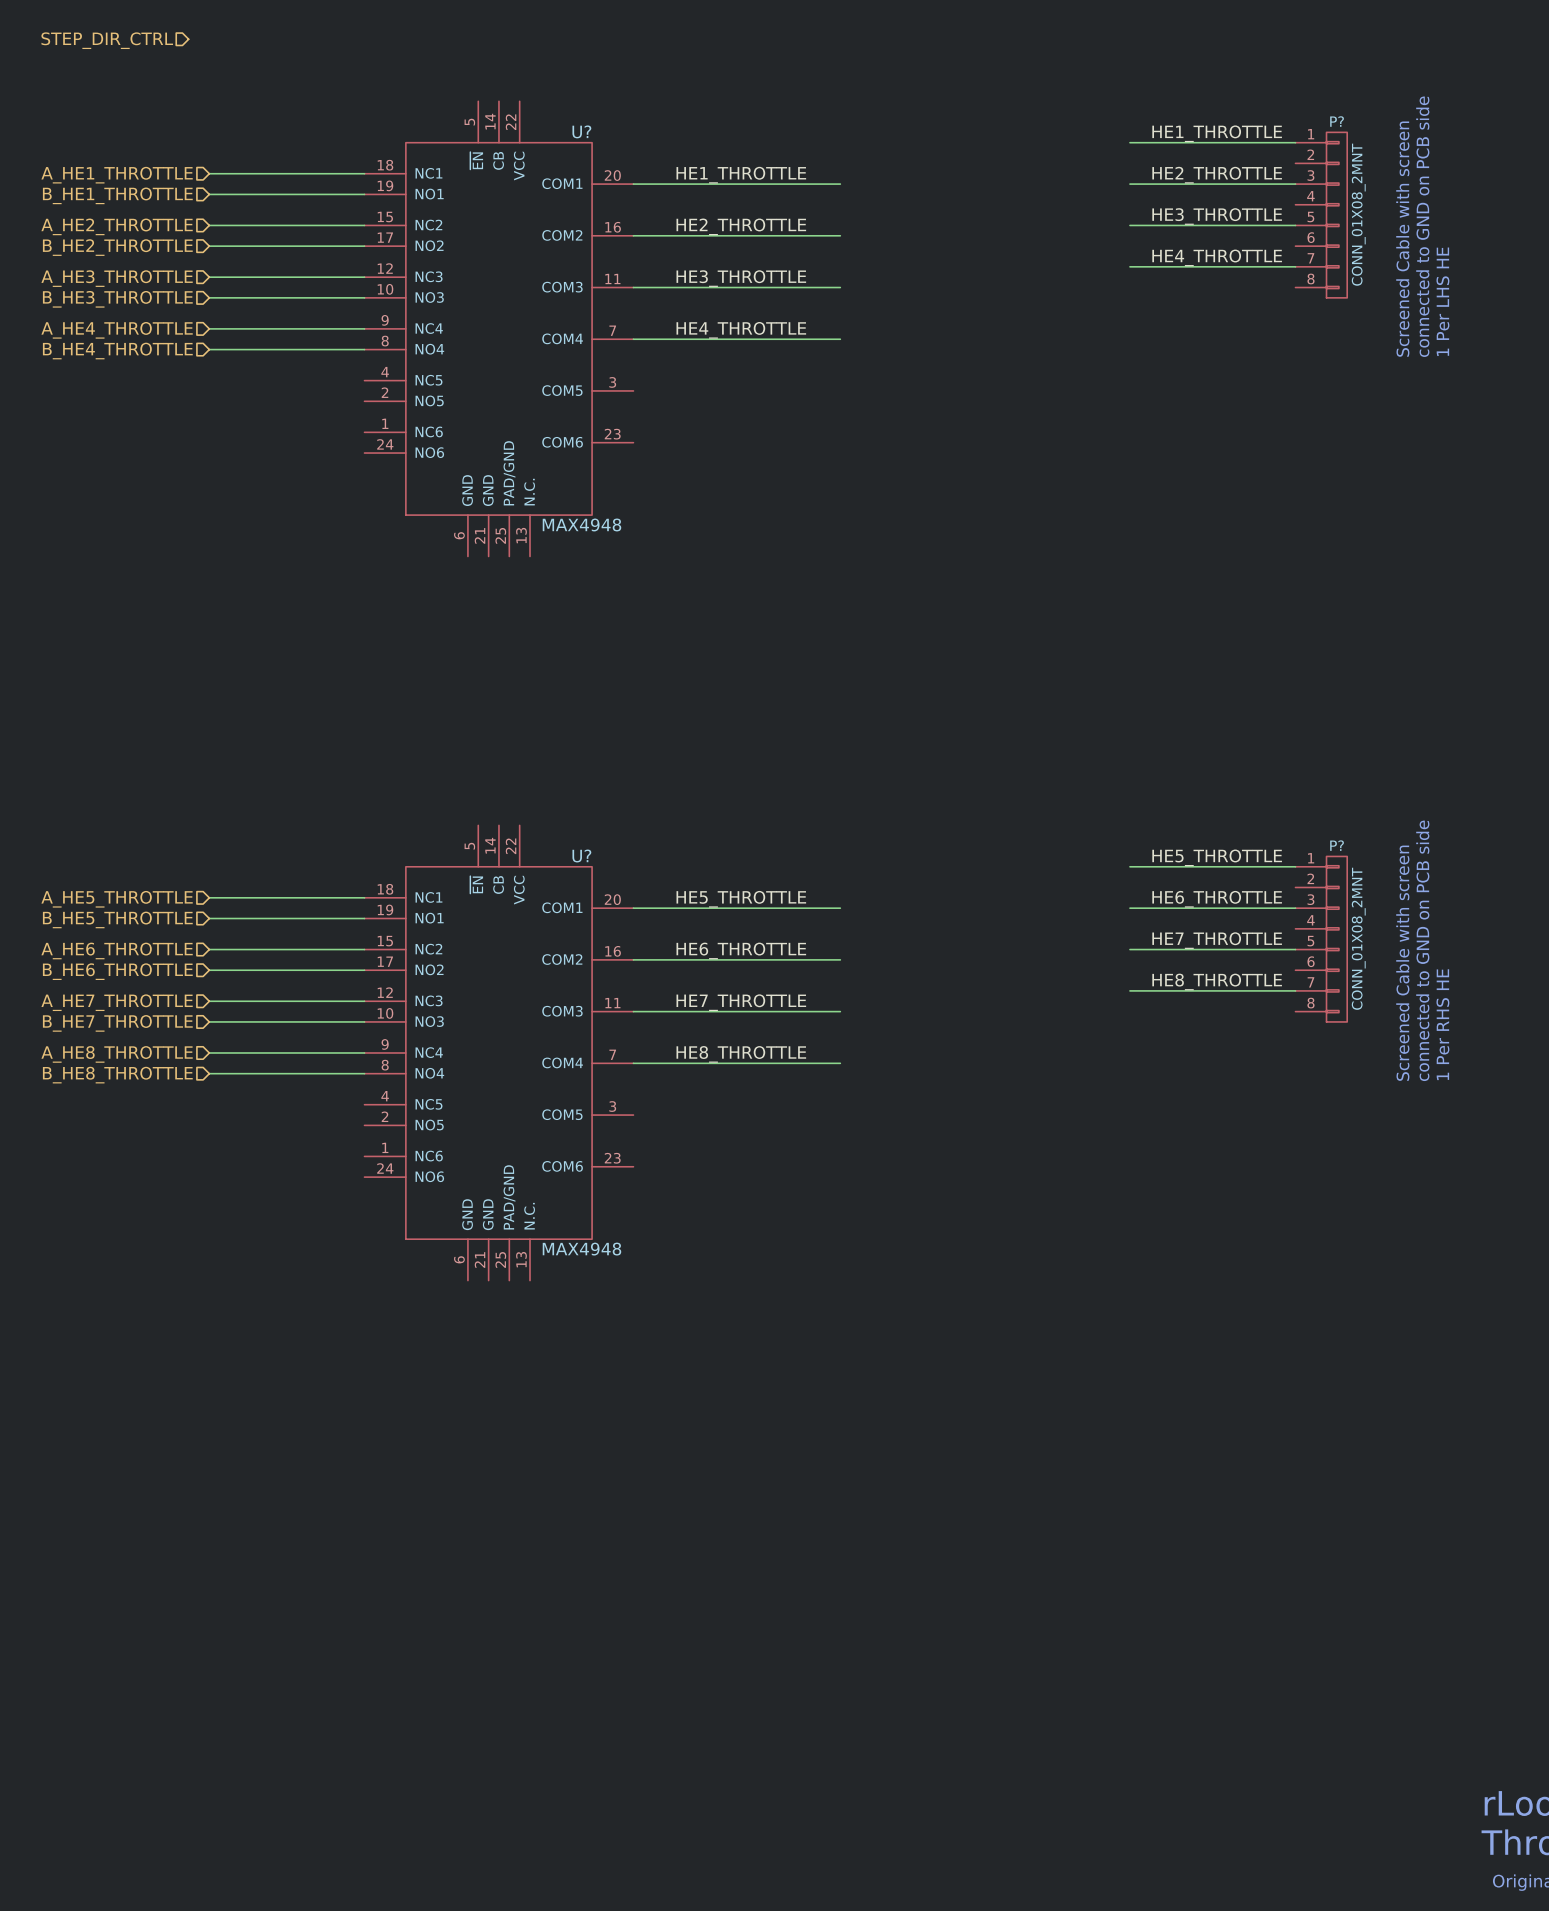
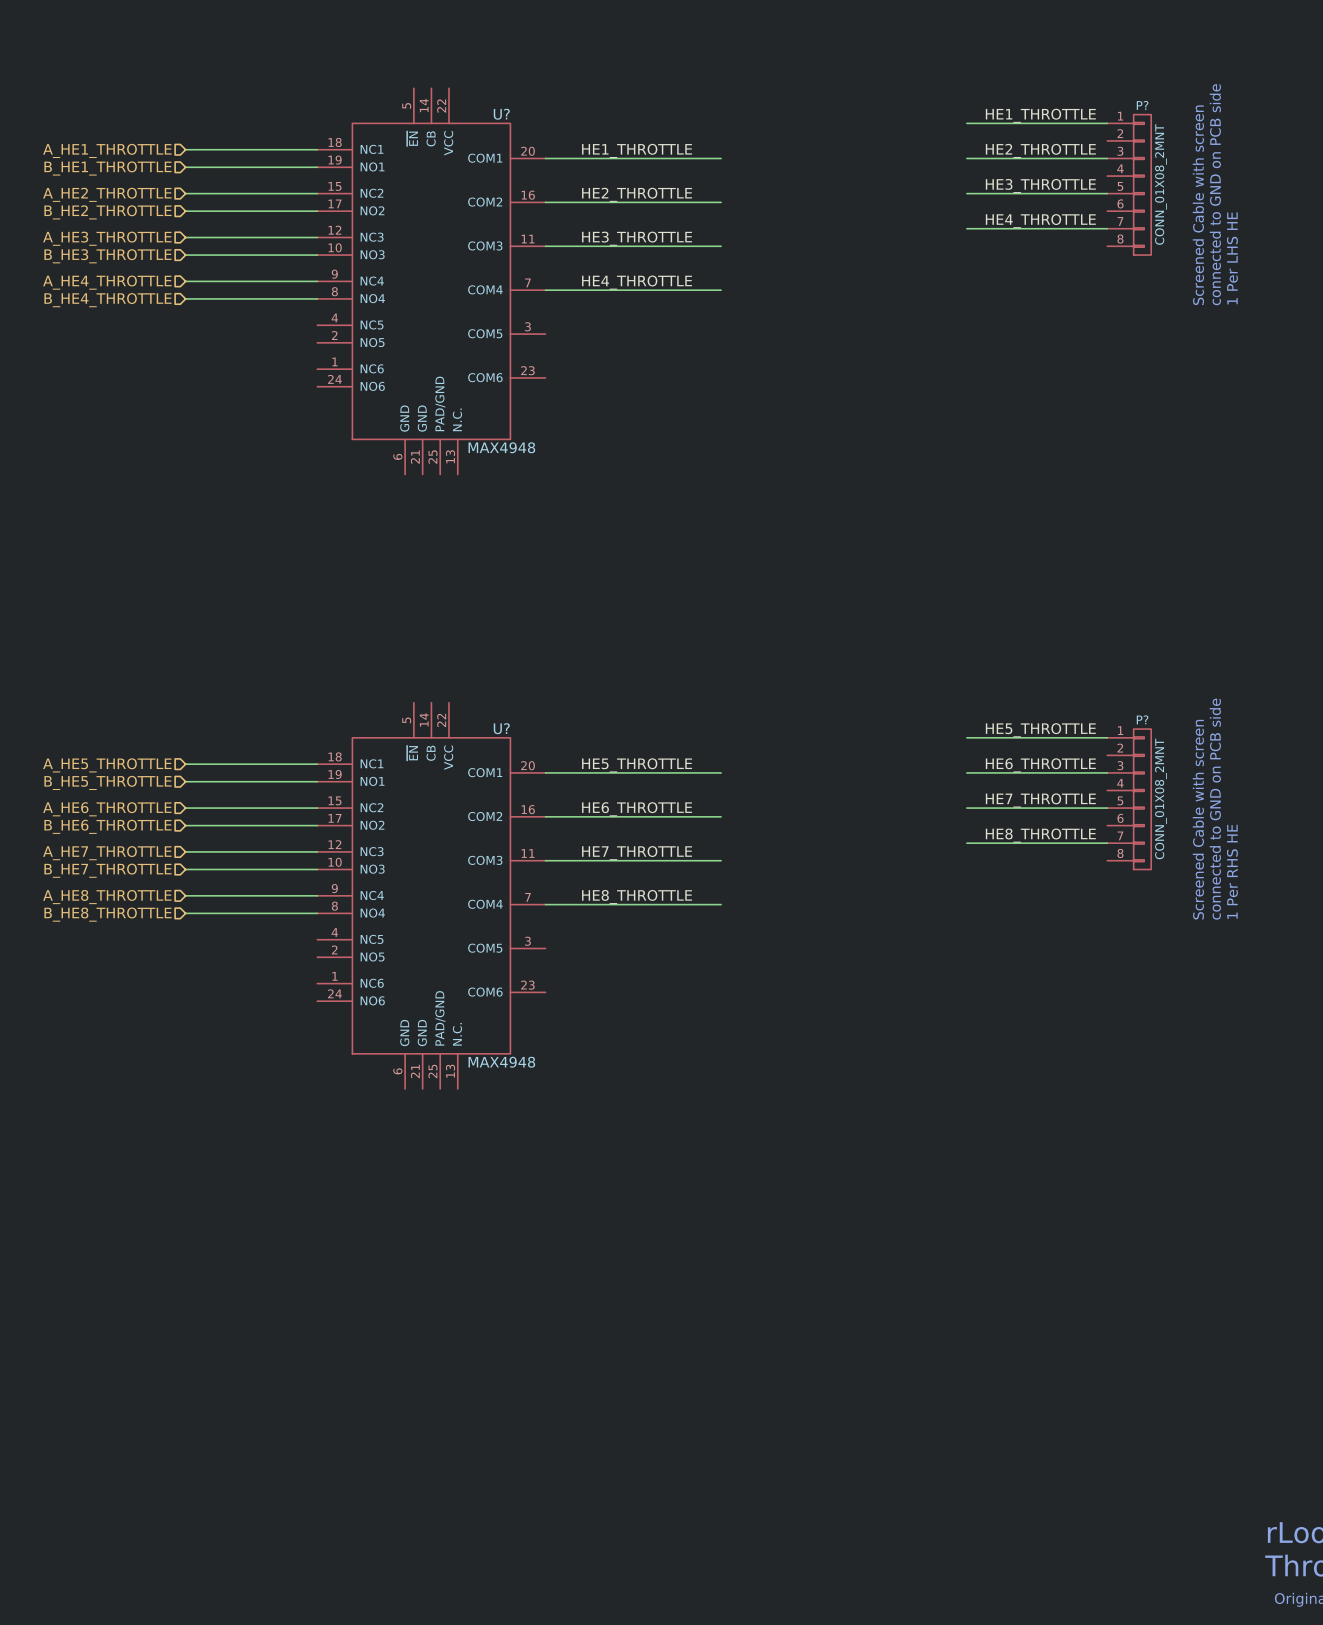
hierarchical label: STEP_DIR_CTRL (107, 40) -> none

